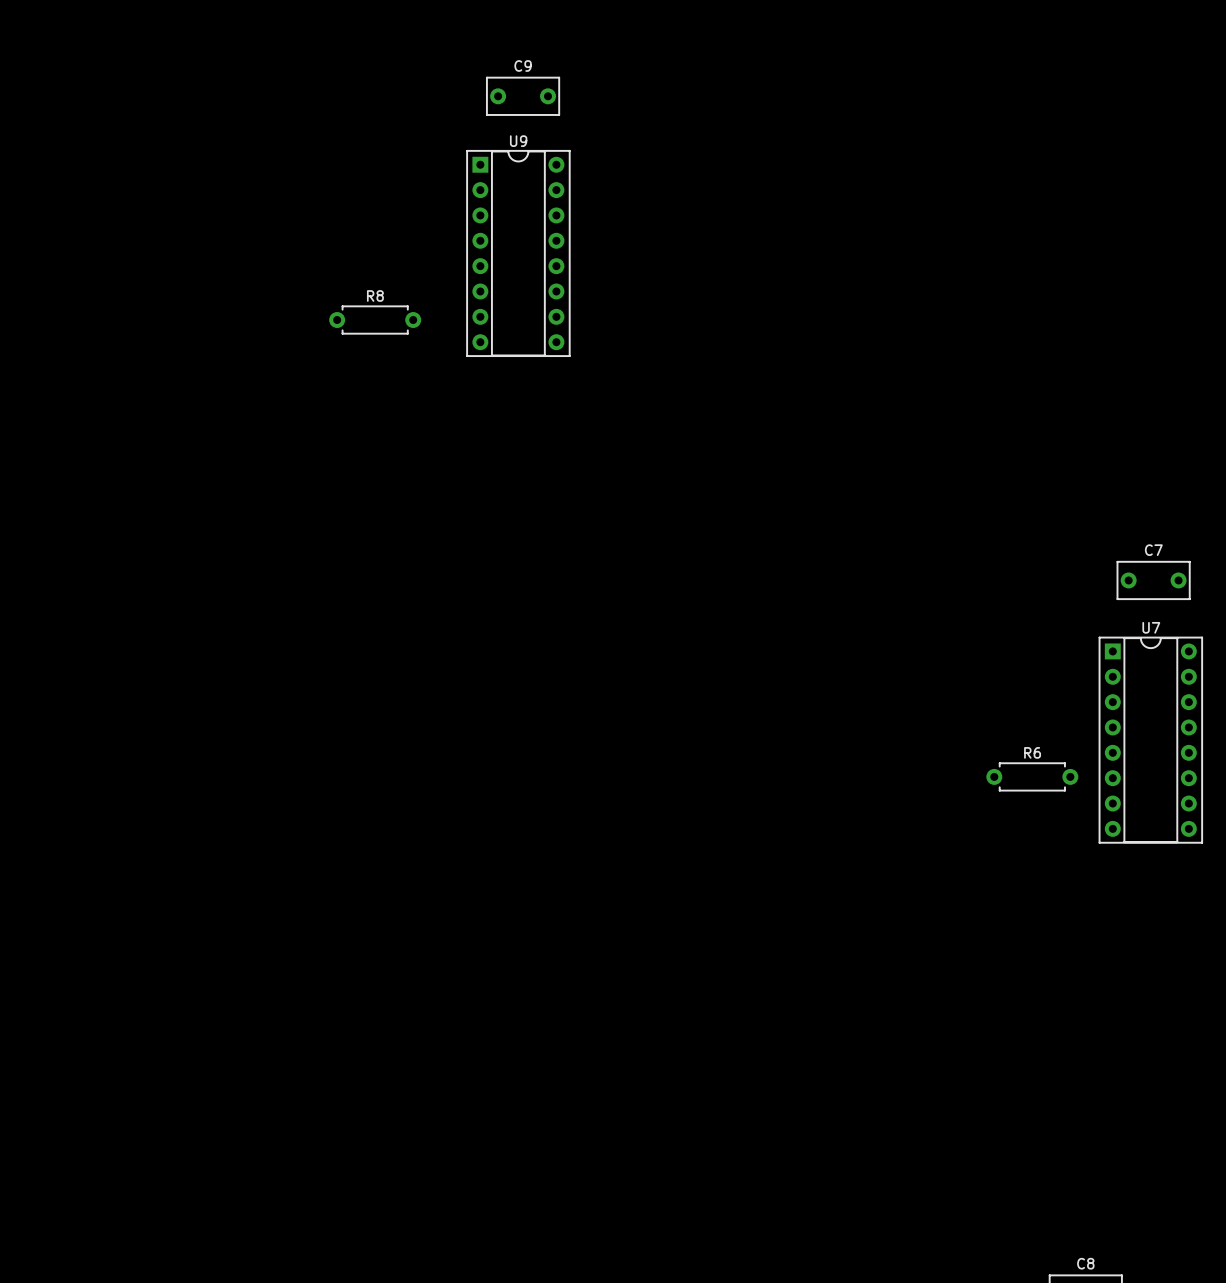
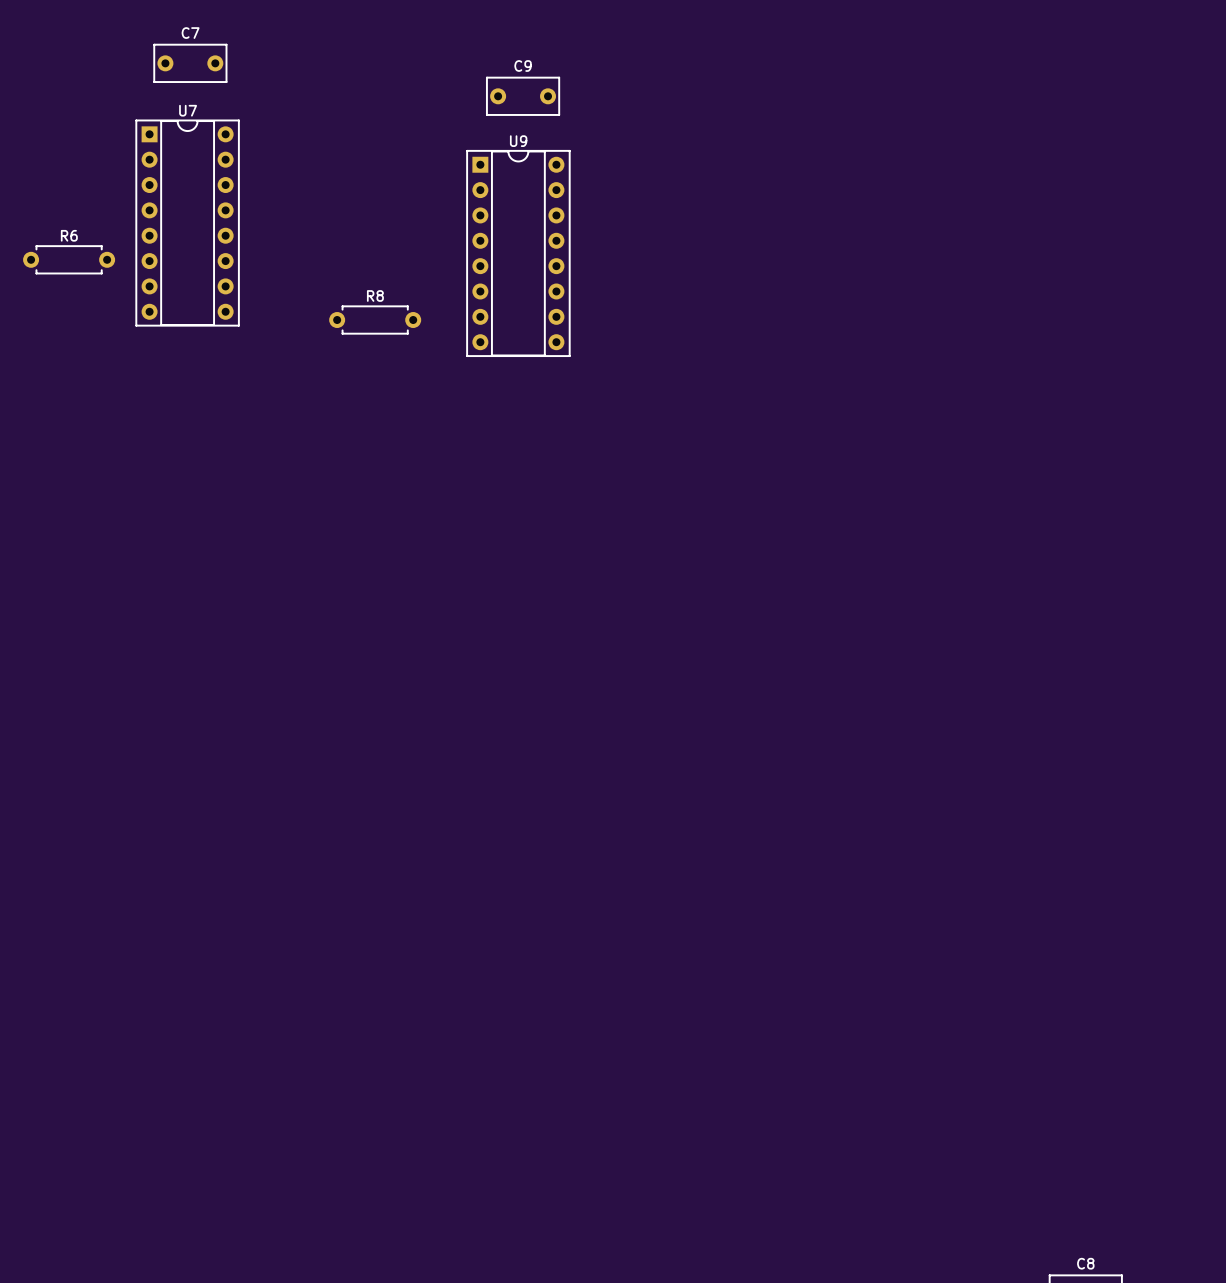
C7 position: (1153, 580) -> (190, 63)
U7 position: (1150, 740) -> (187, 223)
R6 position: (1032, 776) -> (69, 259)

